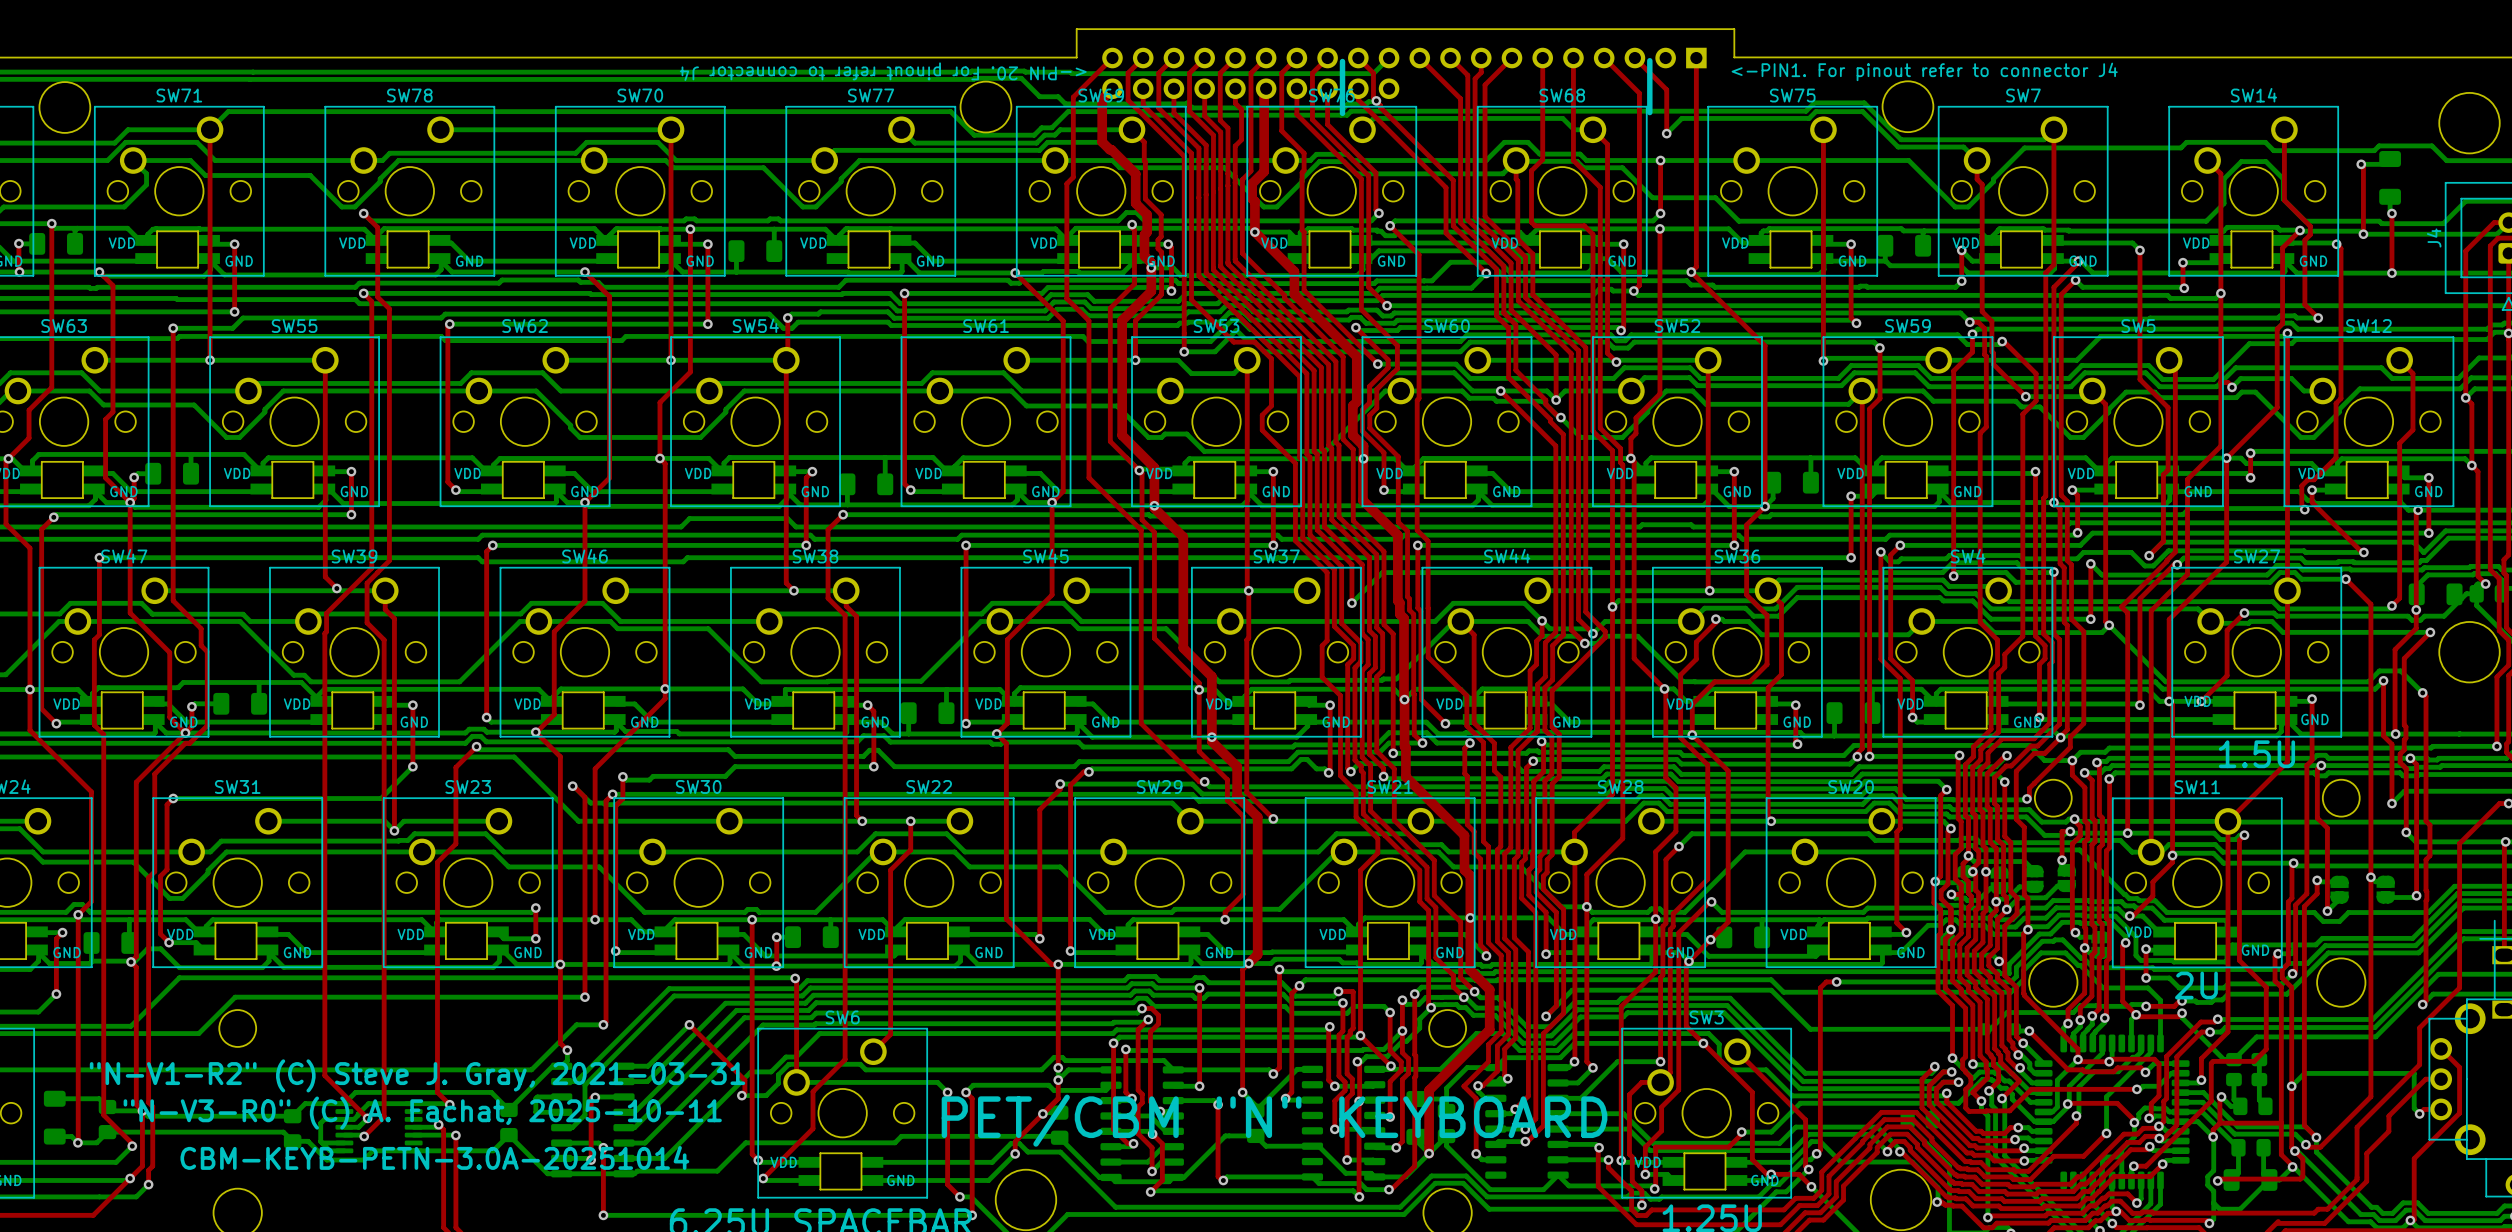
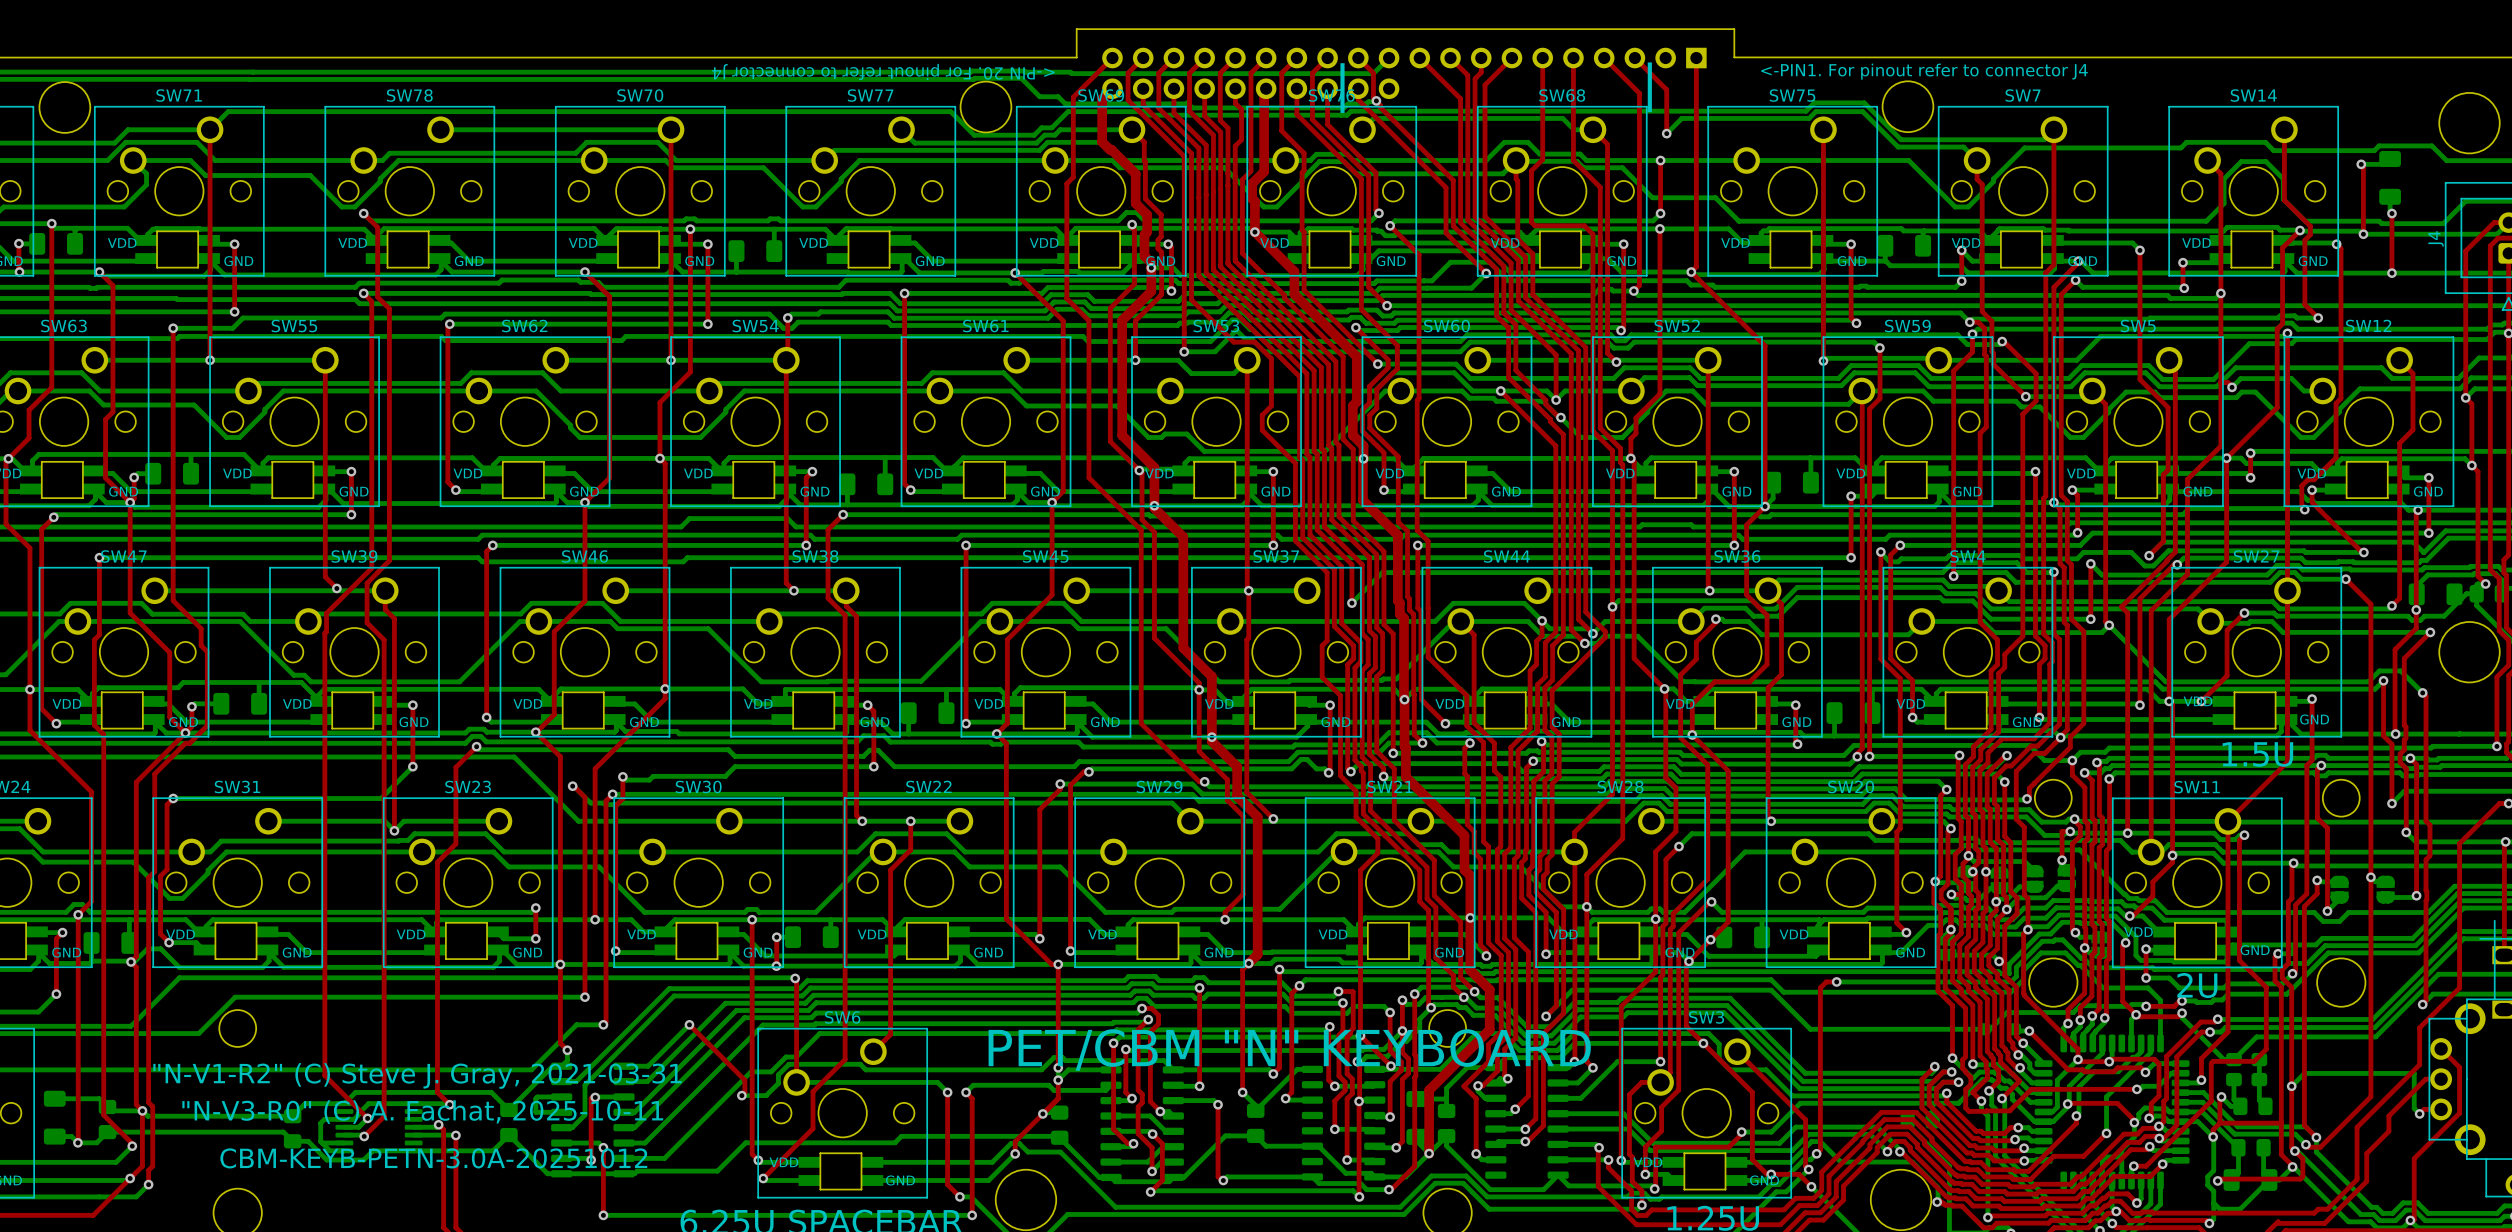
text position: PET/CBM "N" KEYBOARD (1274, 1120) -> PET/CBM "N" KEYBOARD (1289, 1050)
text: CBM-KEYB-PETN-3.0A-20251014 (434, 1157) -> CBM-KEYB-PETN-3.0A-20251012 (433, 1158)

